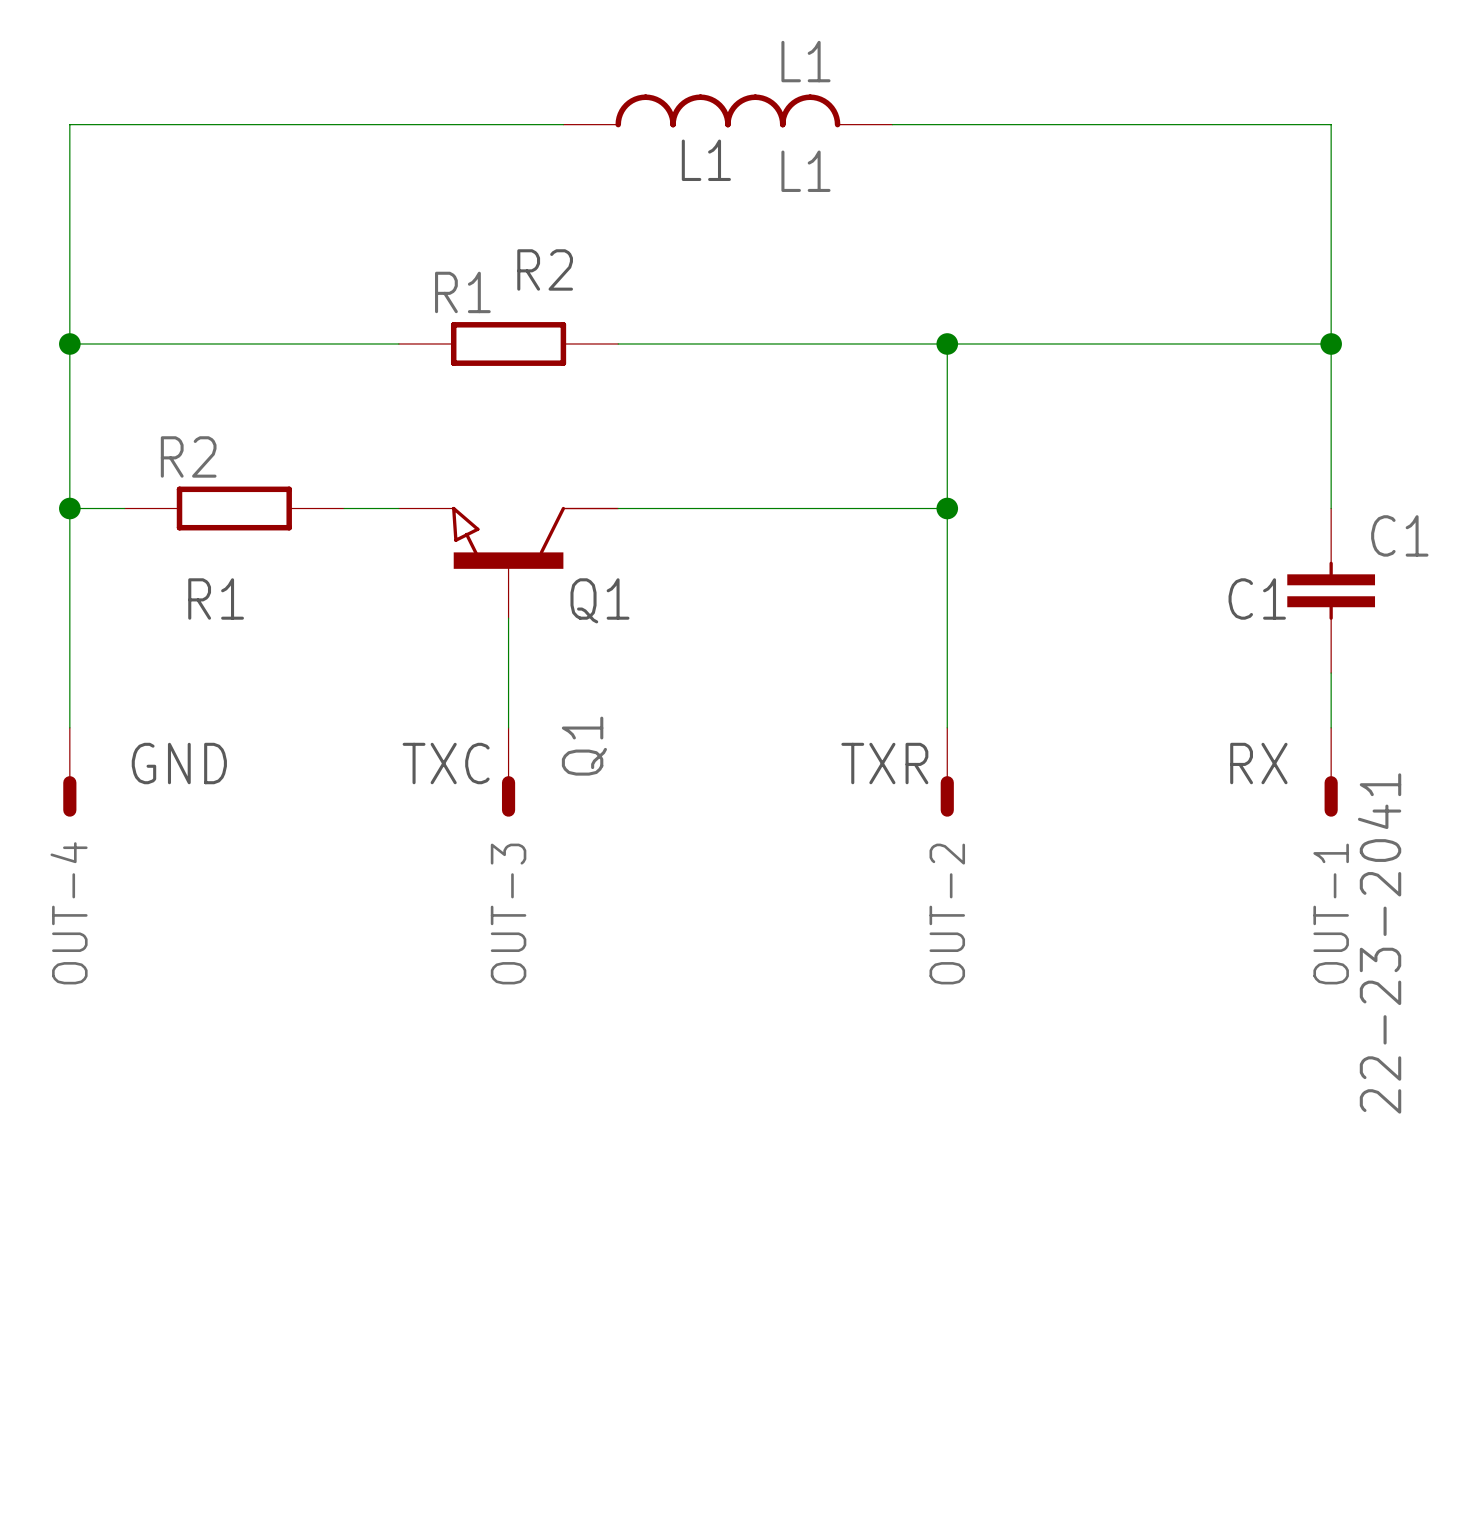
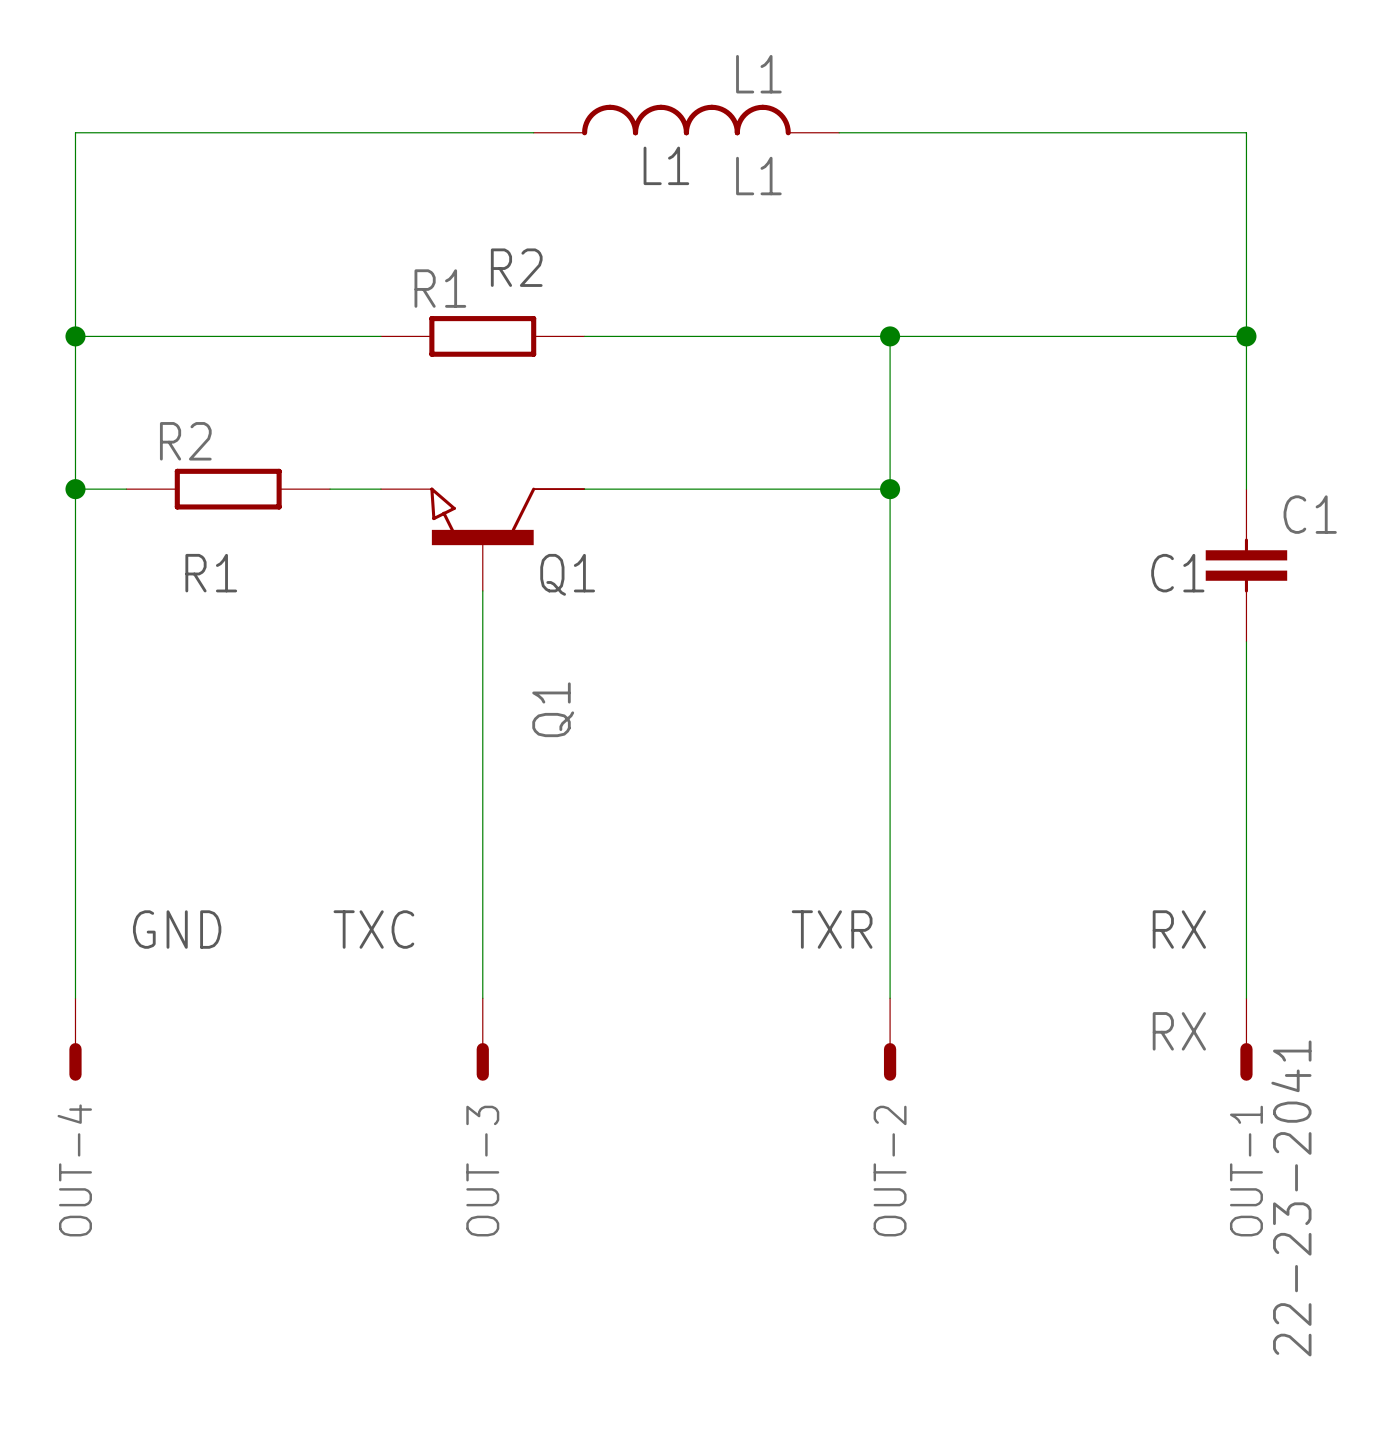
wire: none -> (75, 692) (75, 998)
wire: none -> (482, 692) (482, 998)
wire: none -> (890, 692) (890, 998)
wire: none -> (1246, 692) (1246, 998)
text position: GND (179, 763) -> GND (177, 929)
text position: TXC (446, 763) -> TXC (373, 929)
text position: TXR (884, 763) -> TXR (832, 929)
text position: RX (1258, 763) -> RX (1179, 929)
OUT-4 position: (69, 772) -> (75, 1039)
OUT-3 position: (508, 772) -> (482, 1039)
OUT-2 position: (947, 772) -> (890, 1039)
OUT-1 position: (1331, 772) -> (1246, 1039)
label: none -> RX (1179, 1031)

